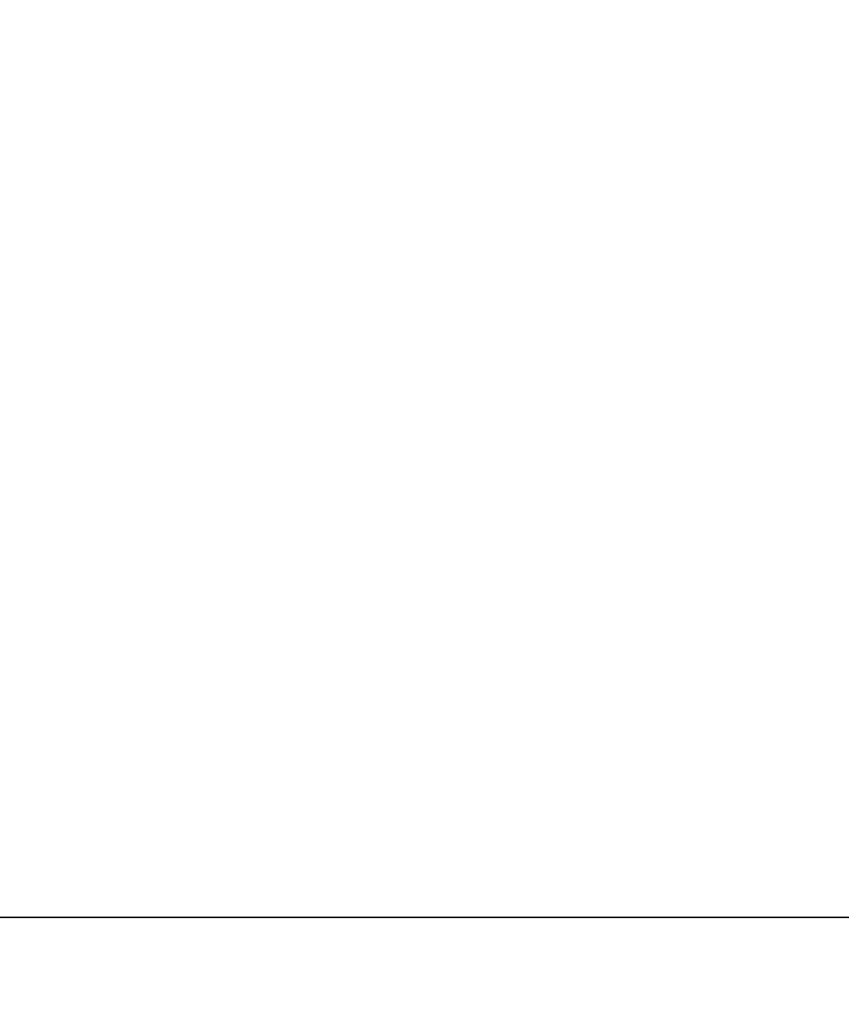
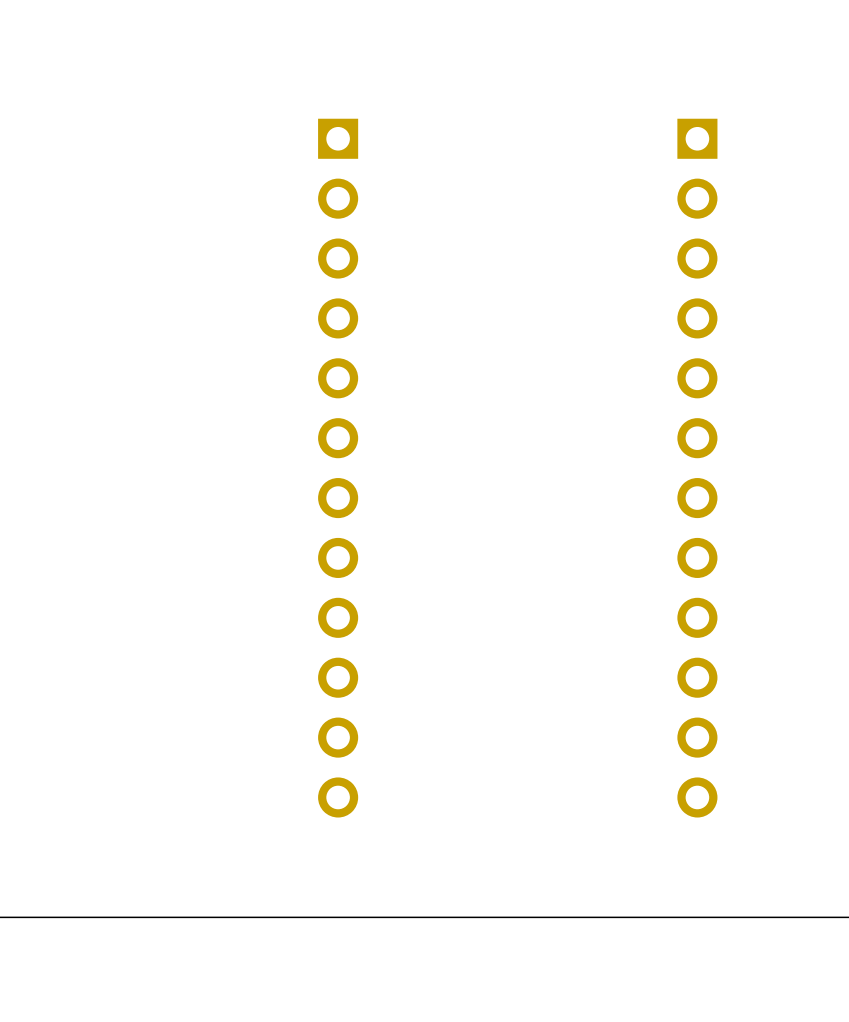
part: none -> (338, 468)
part: none -> (697, 468)

